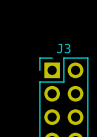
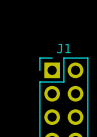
J3 name: J3 (63, 48) -> J1 (63, 48)

